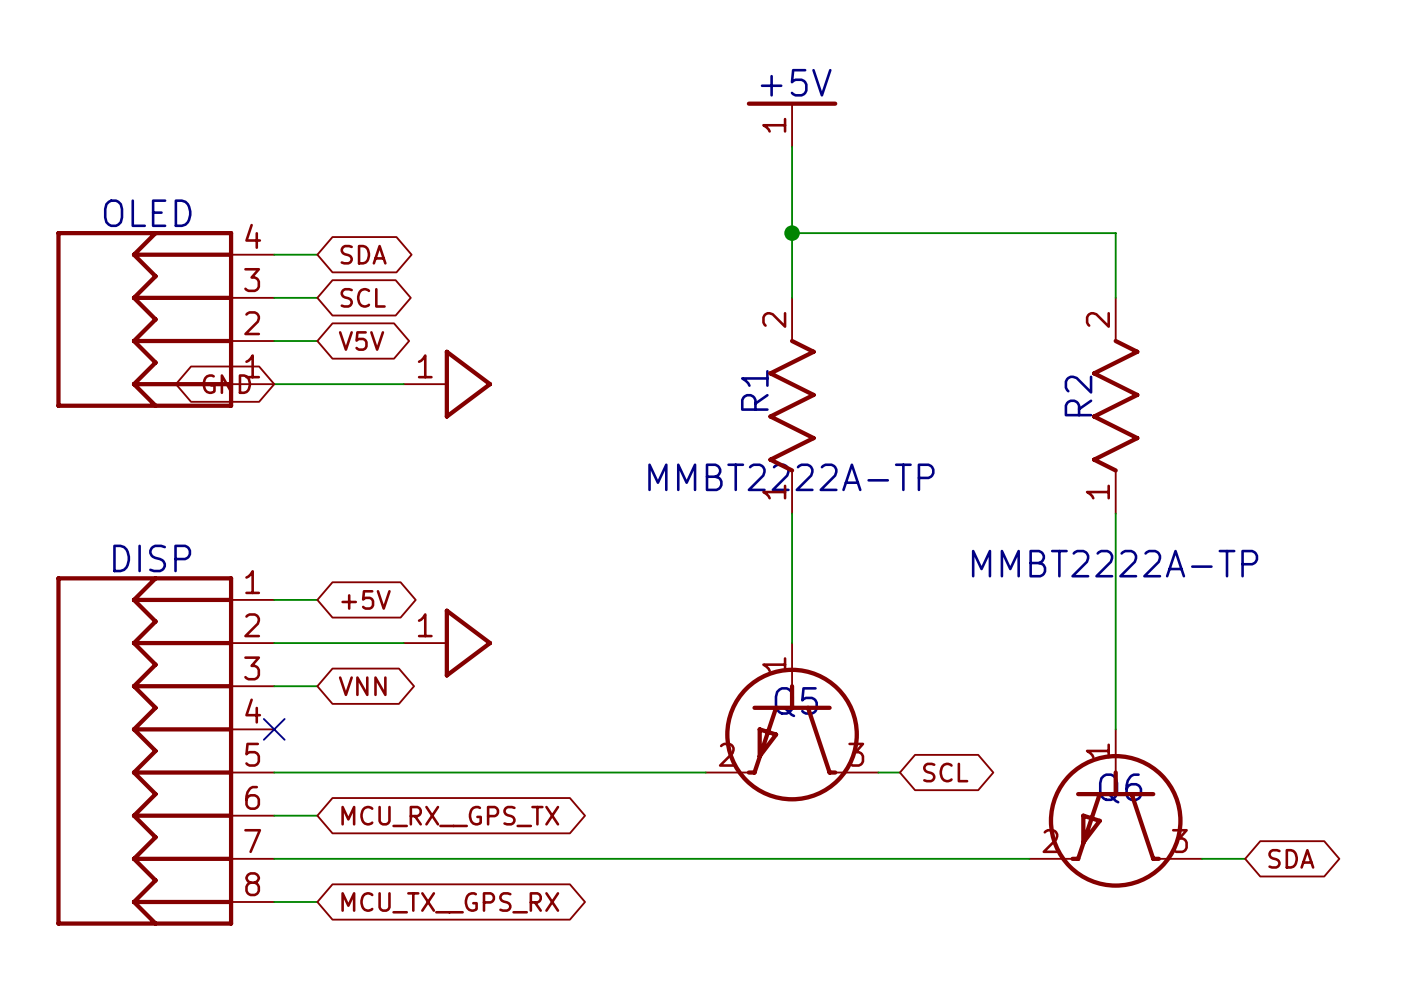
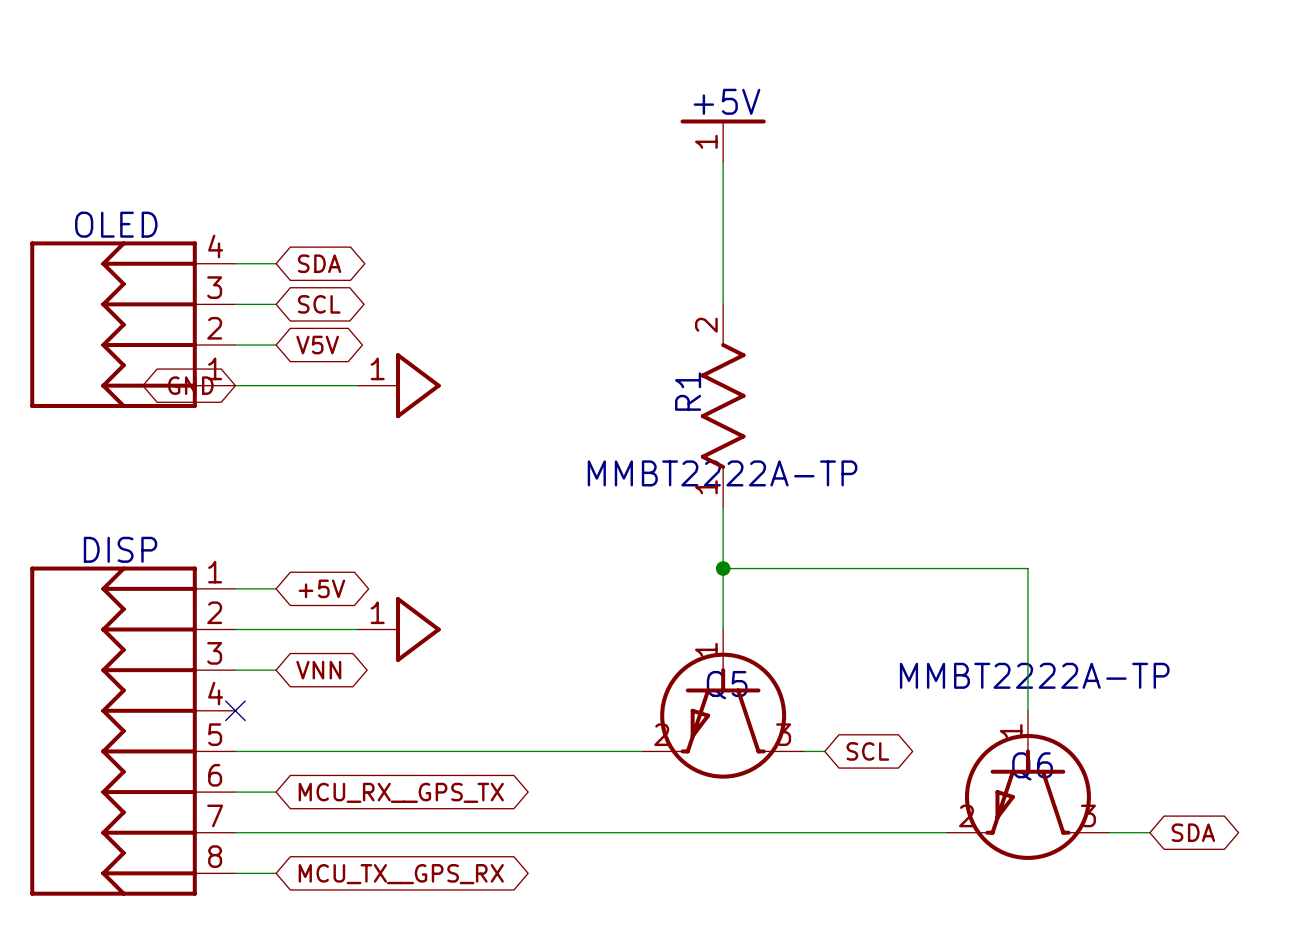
wire: (792, 233) (1115, 233) (1115, 297) -> none
junction: (792, 233) -> none
text: R2 (1078, 395) -> none
part: (1115, 405) -> none
wire: (1115, 513) (1115, 578) -> (723, 568) (1027, 568)
text position: MMBT2222A-TP (1115, 563) -> MMBT2222A-TP (1034, 675)
junction: none -> (723, 568)

